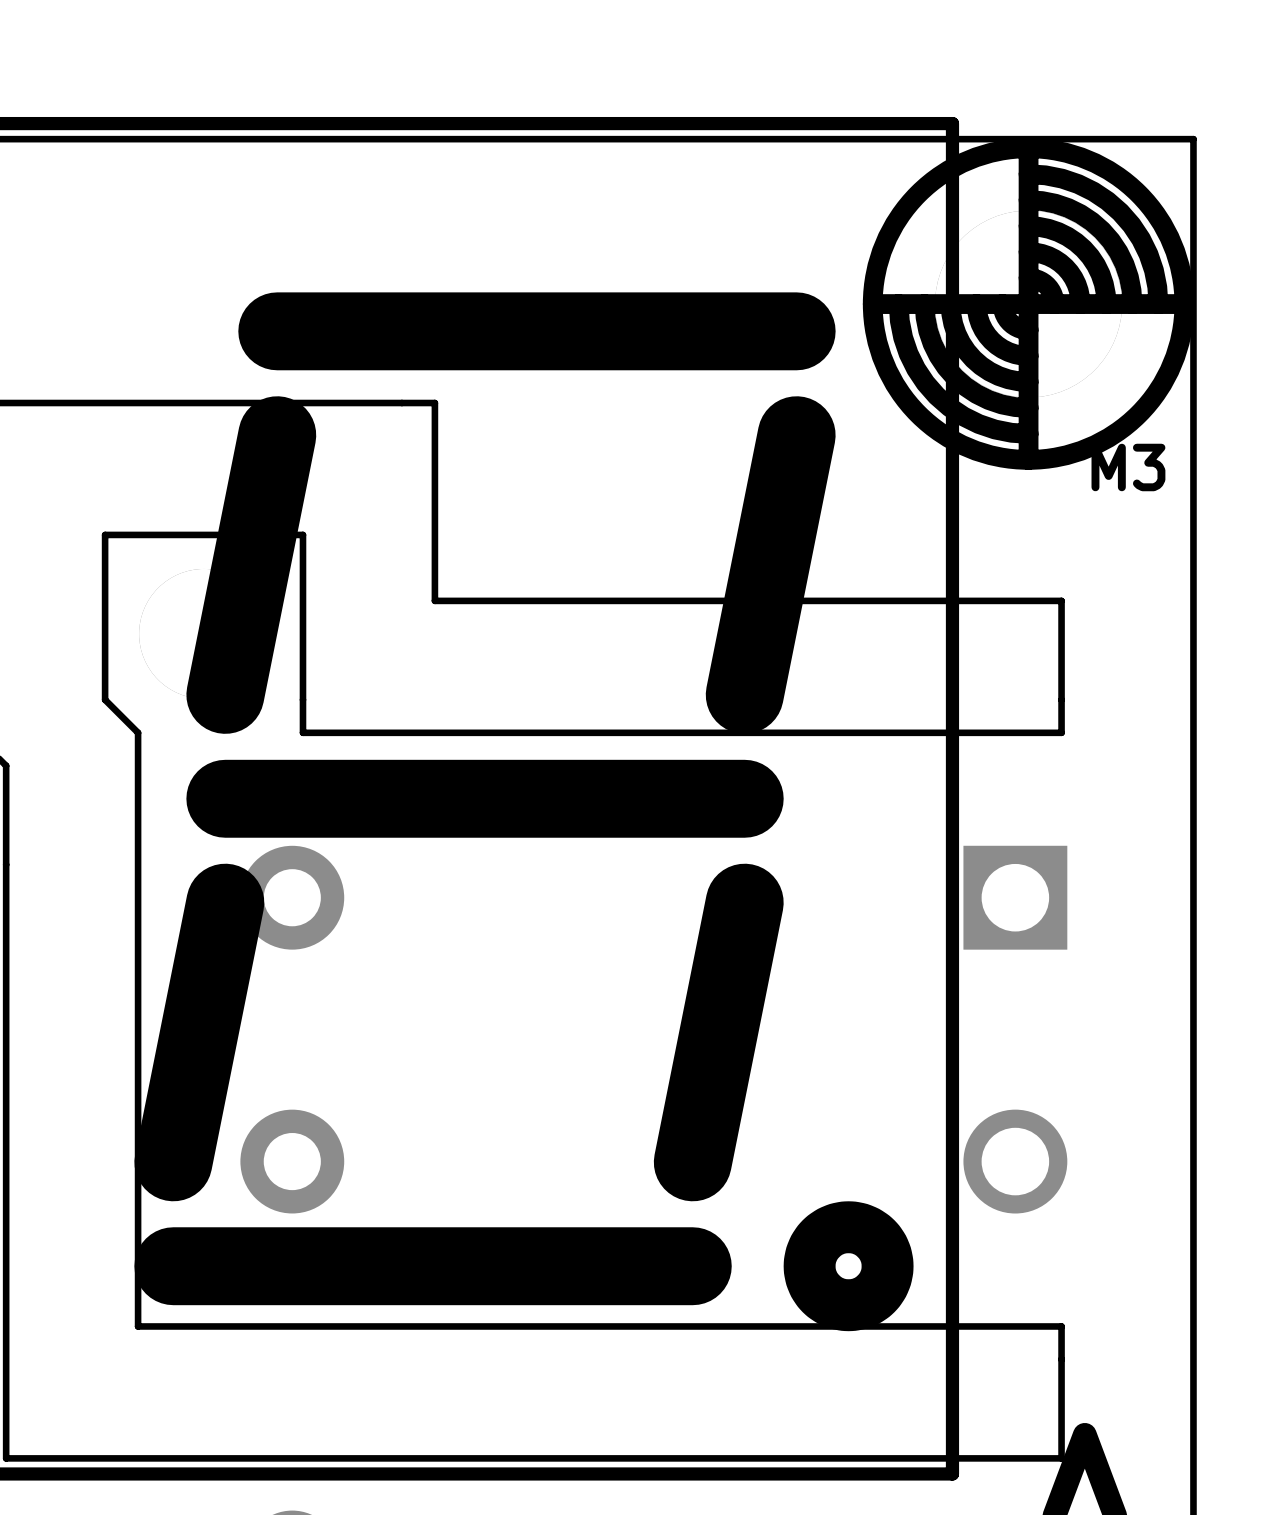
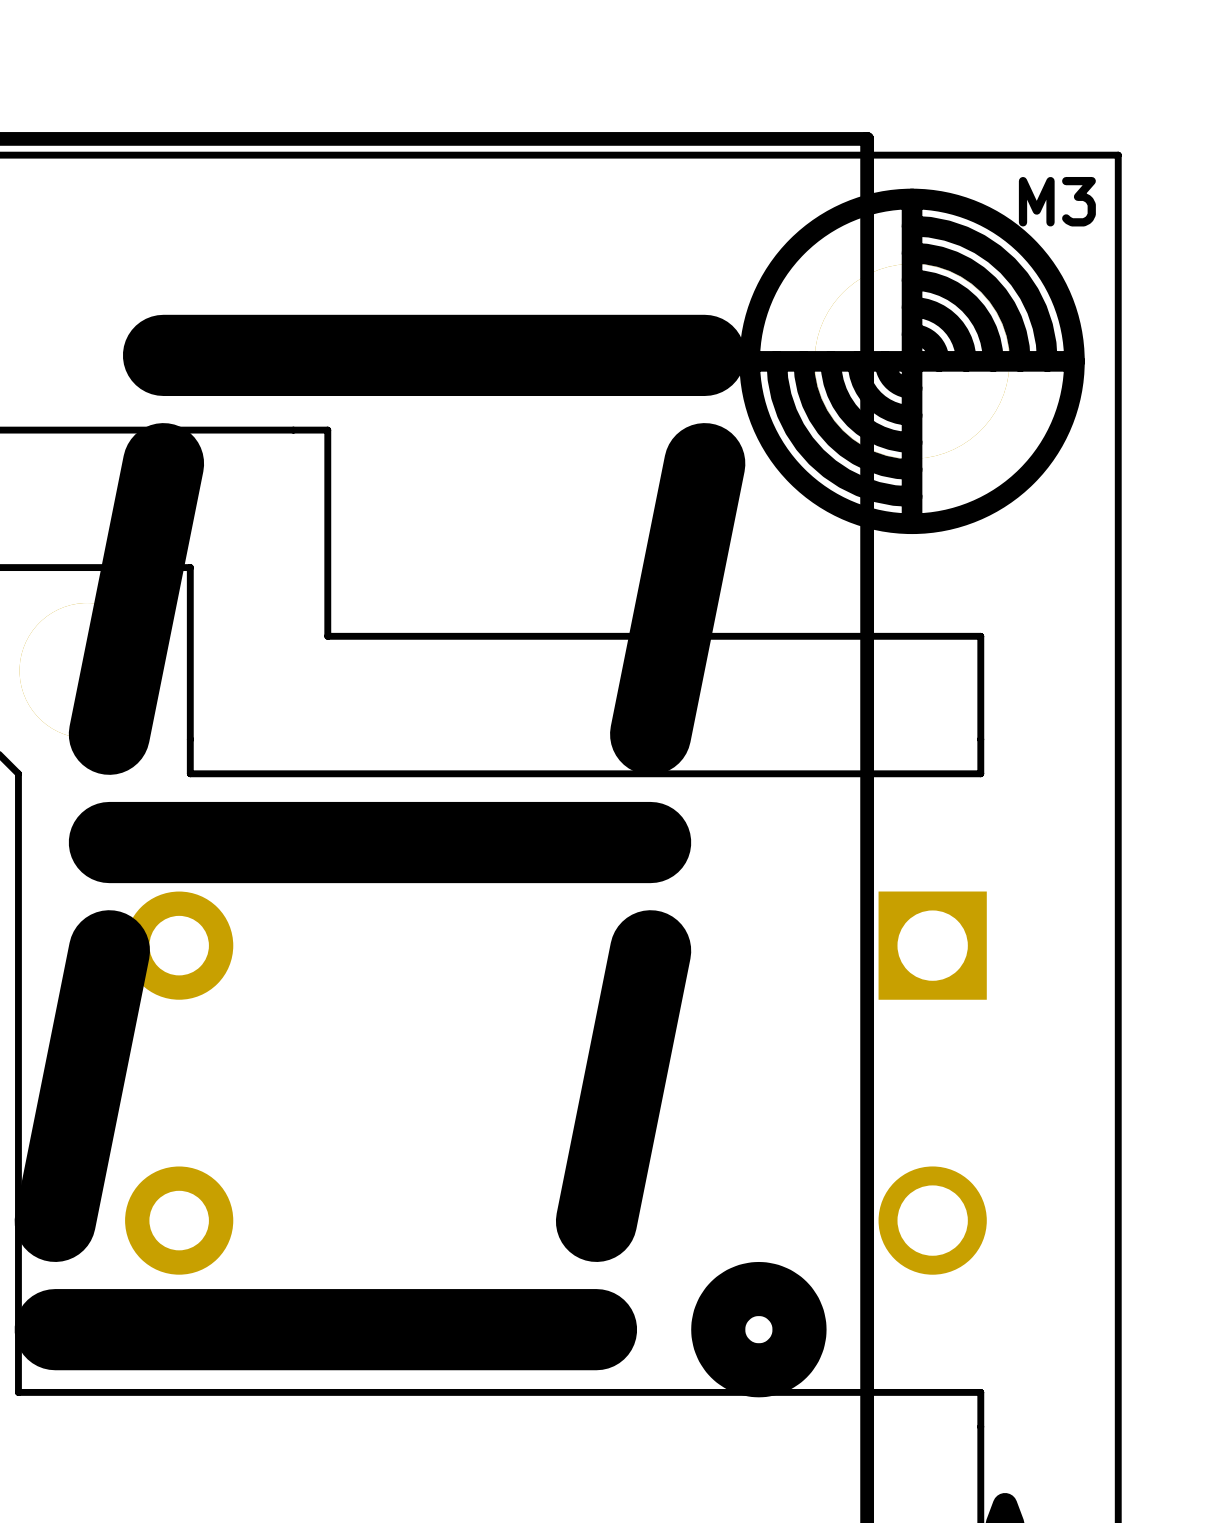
M3 position: (1028, 304) -> (912, 361)
M3 name position: M3 (1128, 467) -> M3 (1057, 201)

